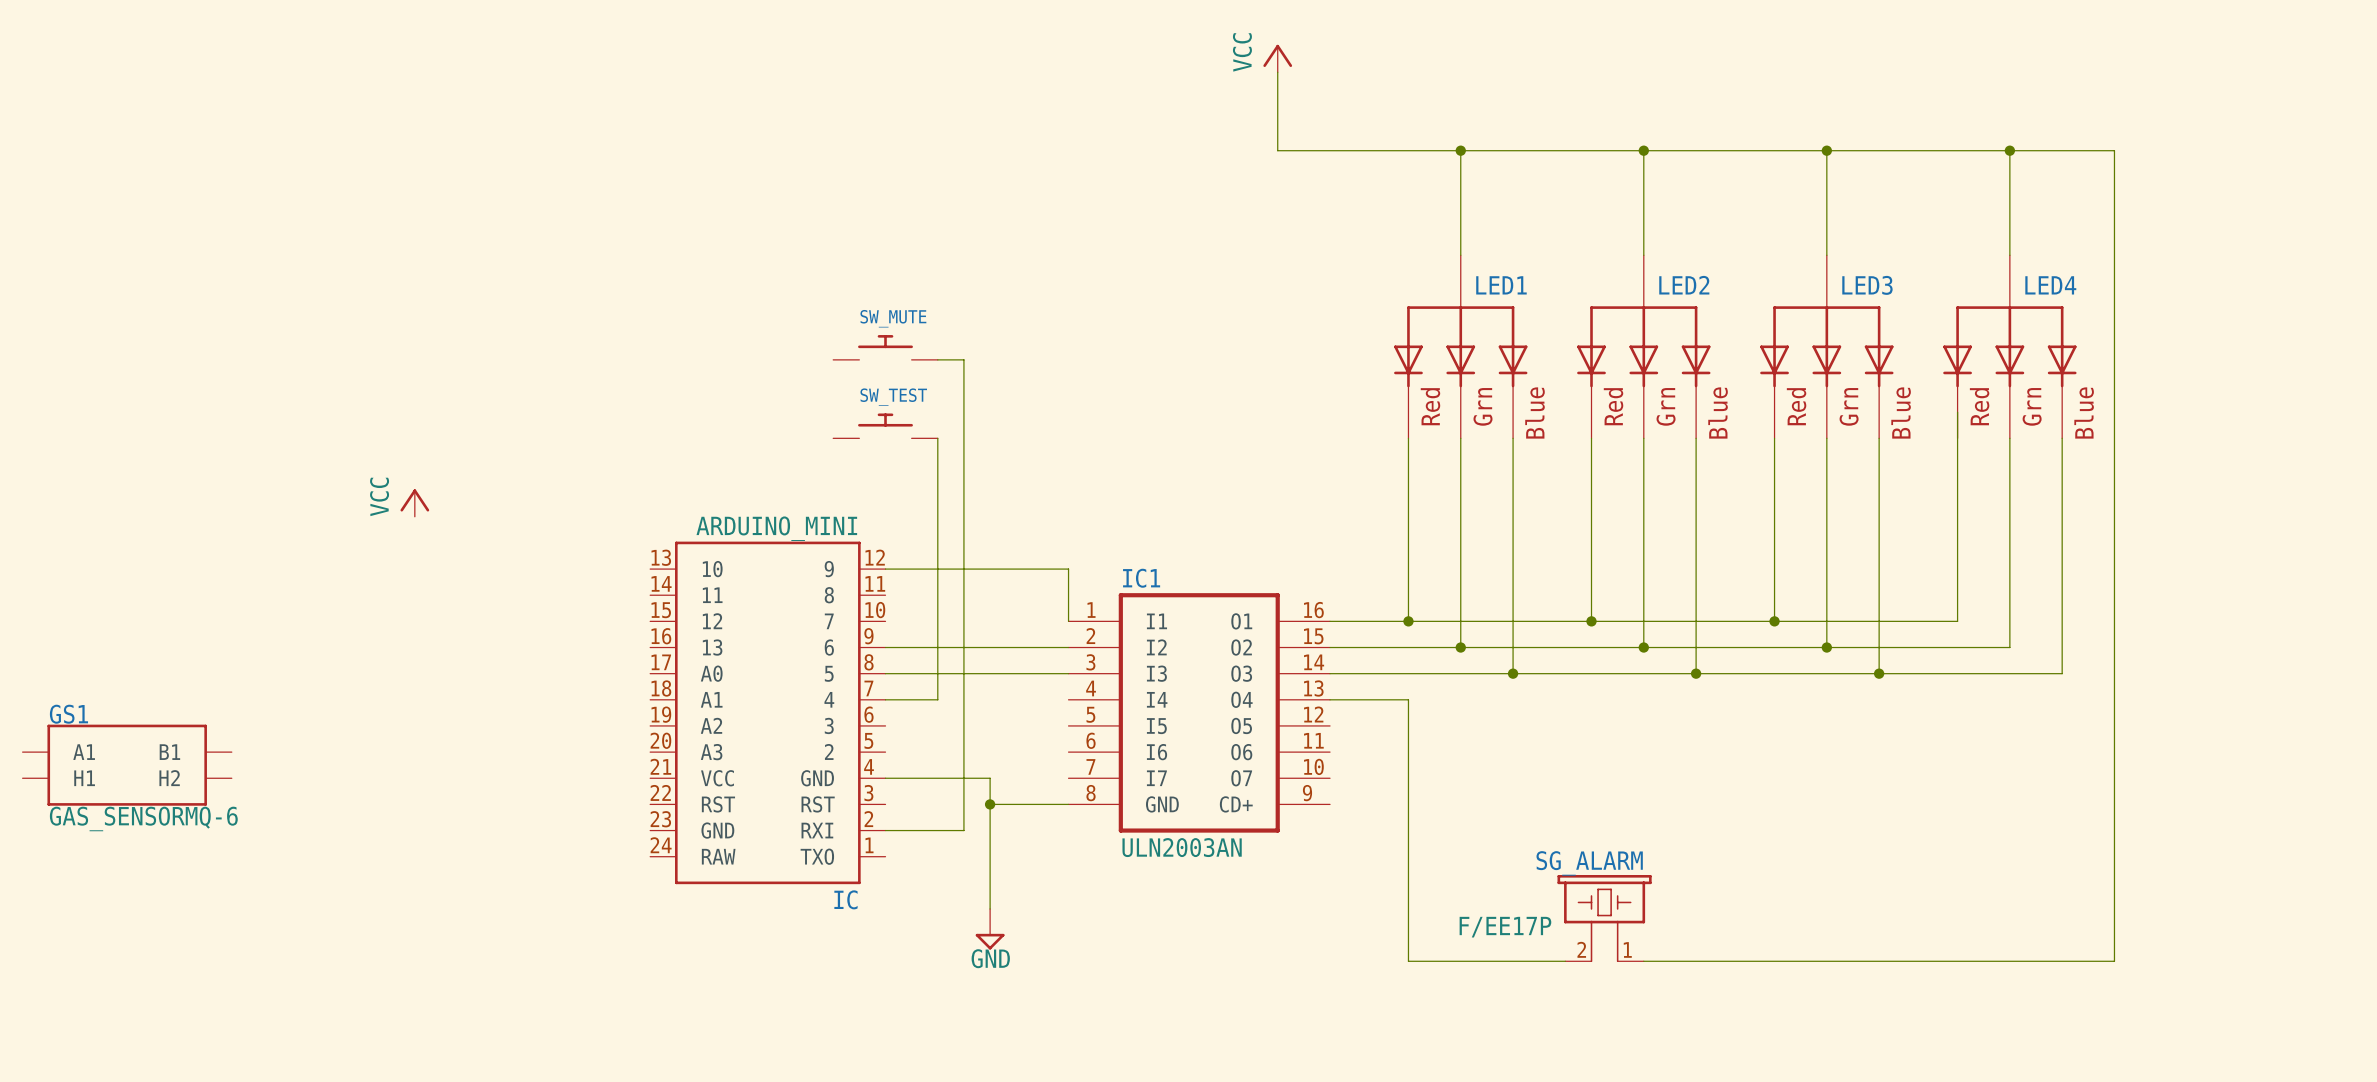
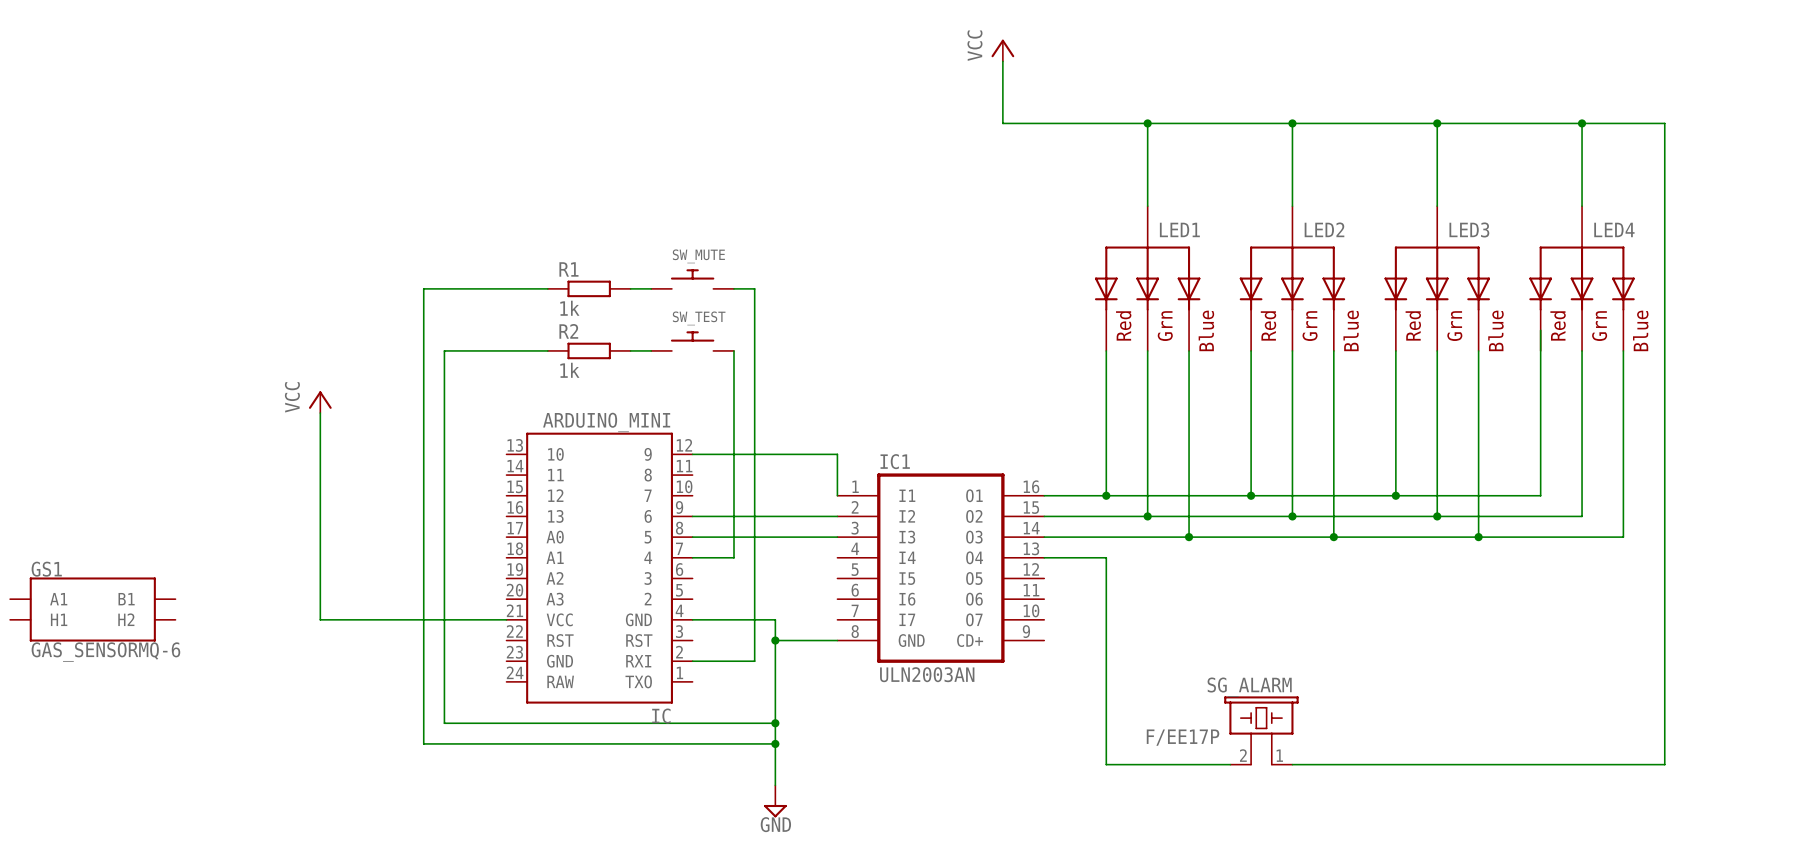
wire: none -> (547, 288) (423, 288) (423, 743) (775, 743)
R1: none -> 1k (589, 288)
wire: none -> (630, 288) (651, 288)
wire: none -> (547, 350) (444, 350) (444, 723) (775, 723) (775, 785)
R2: none -> 1k (589, 350)
wire: none -> (630, 350) (651, 350)
wire: none -> (320, 413) (320, 619) (506, 619)
junction: none -> (775, 723)
power symbol position: GND (990, 929) -> GND (775, 801)
junction: none -> (775, 743)

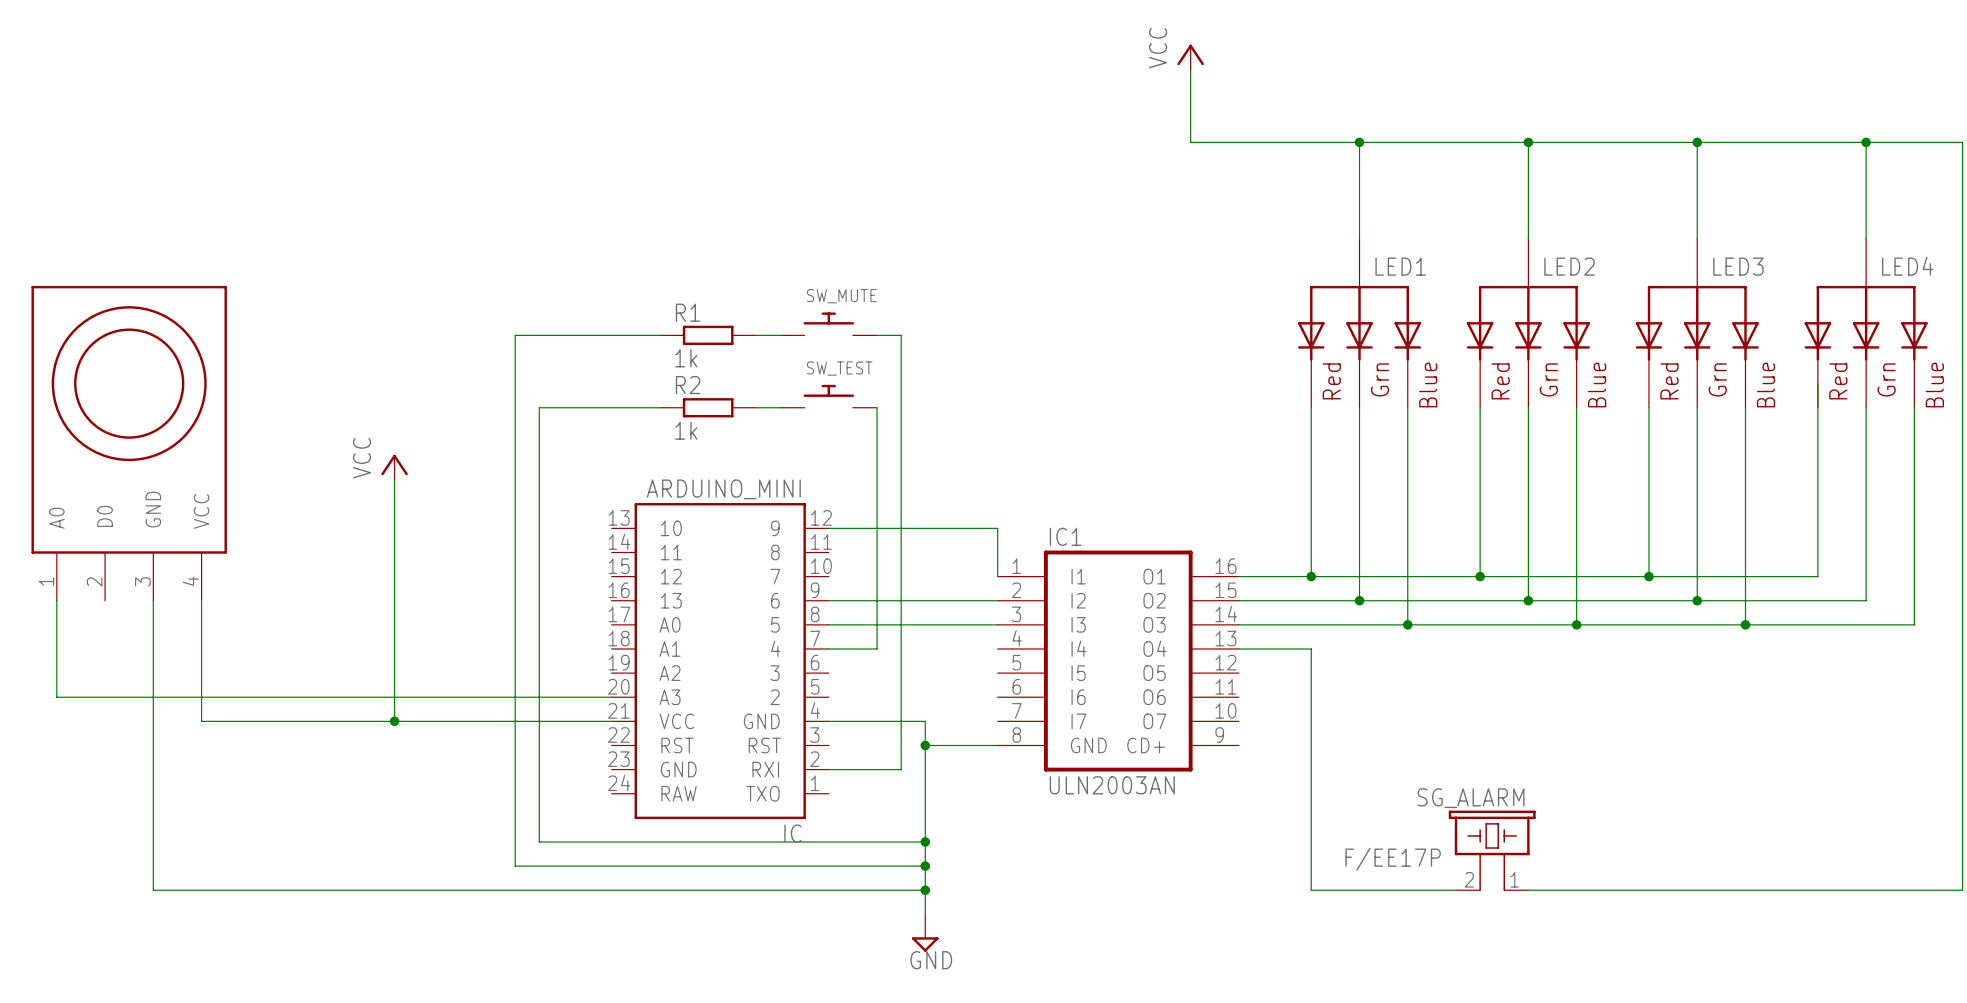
part: none -> (129, 443)
wire: none -> (56, 600) (56, 697) (611, 697)
wire: none -> (153, 600) (153, 890) (925, 890)
wire: none -> (201, 600) (201, 721) (394, 721)
GS1: GAS_SENSORMQ-6 (92, 609) -> none
junction: none -> (394, 721)
junction: none -> (925, 890)

